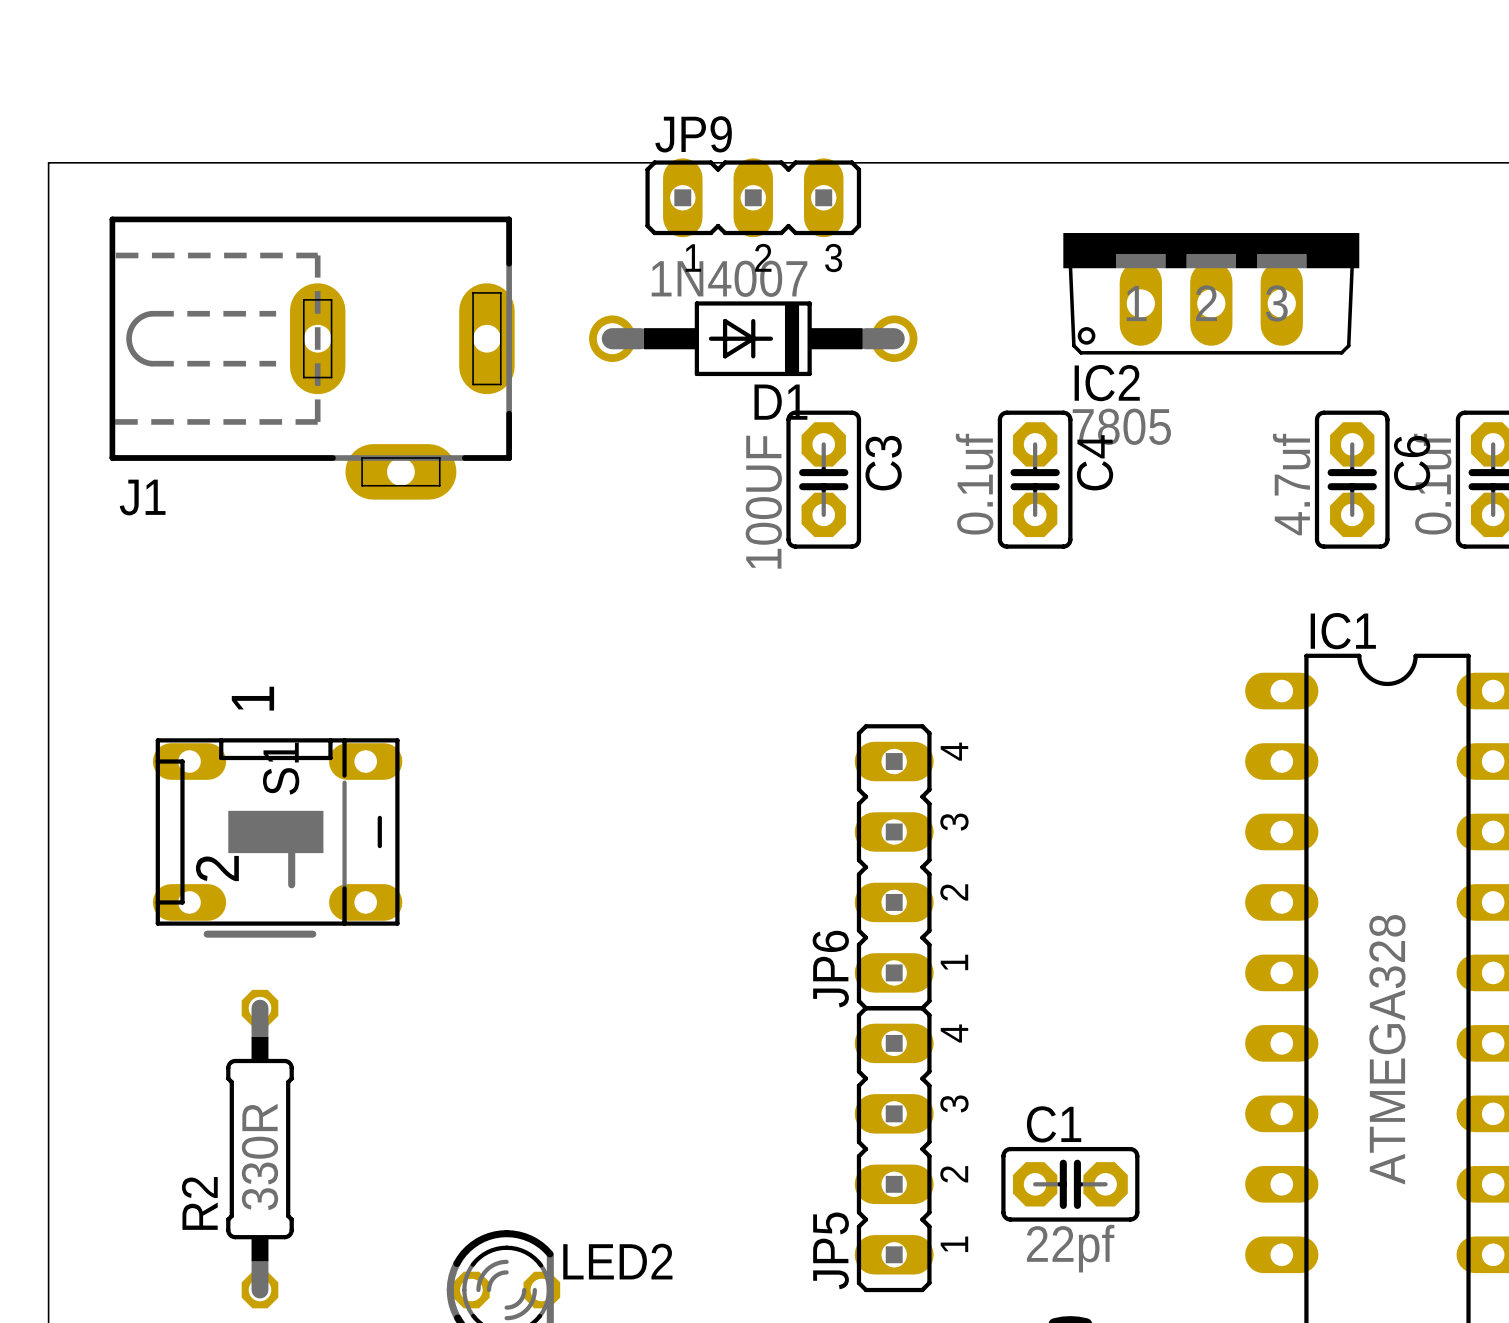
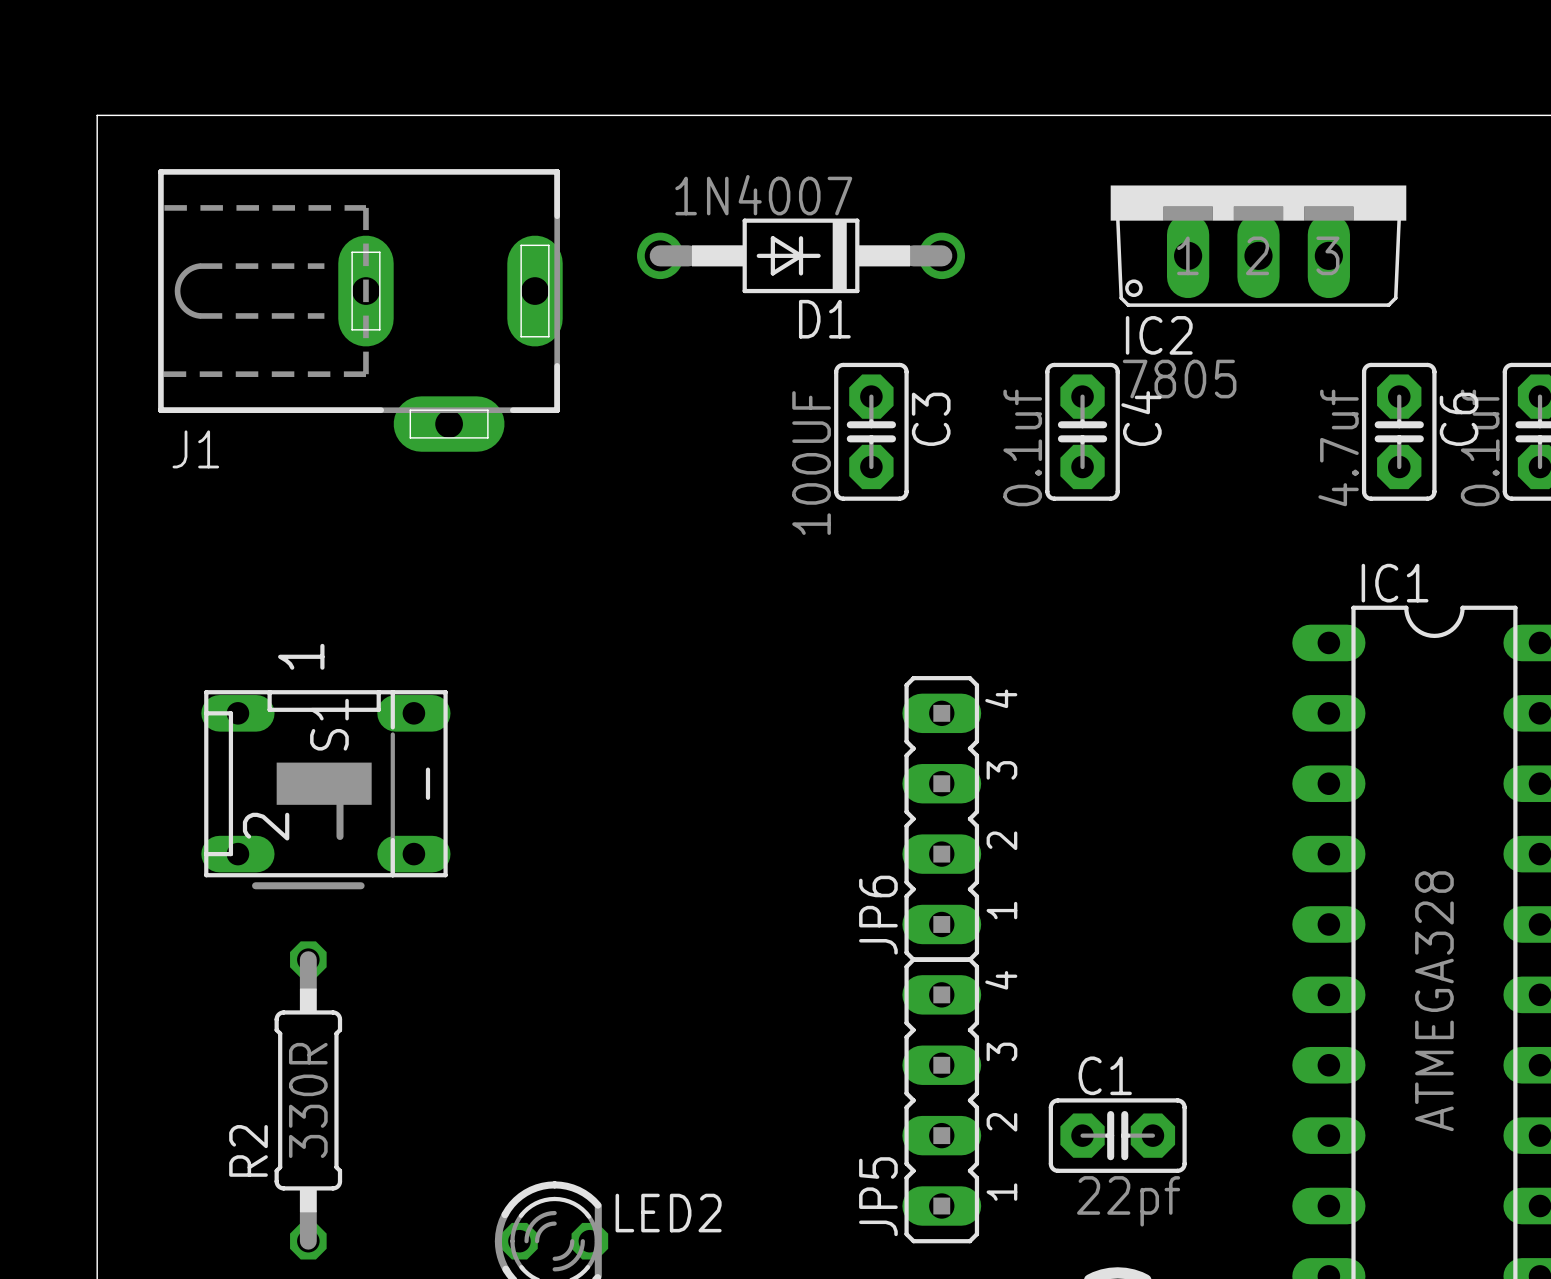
JP9: (753, 197) -> none
D1 position: (753, 338) -> (801, 255)

